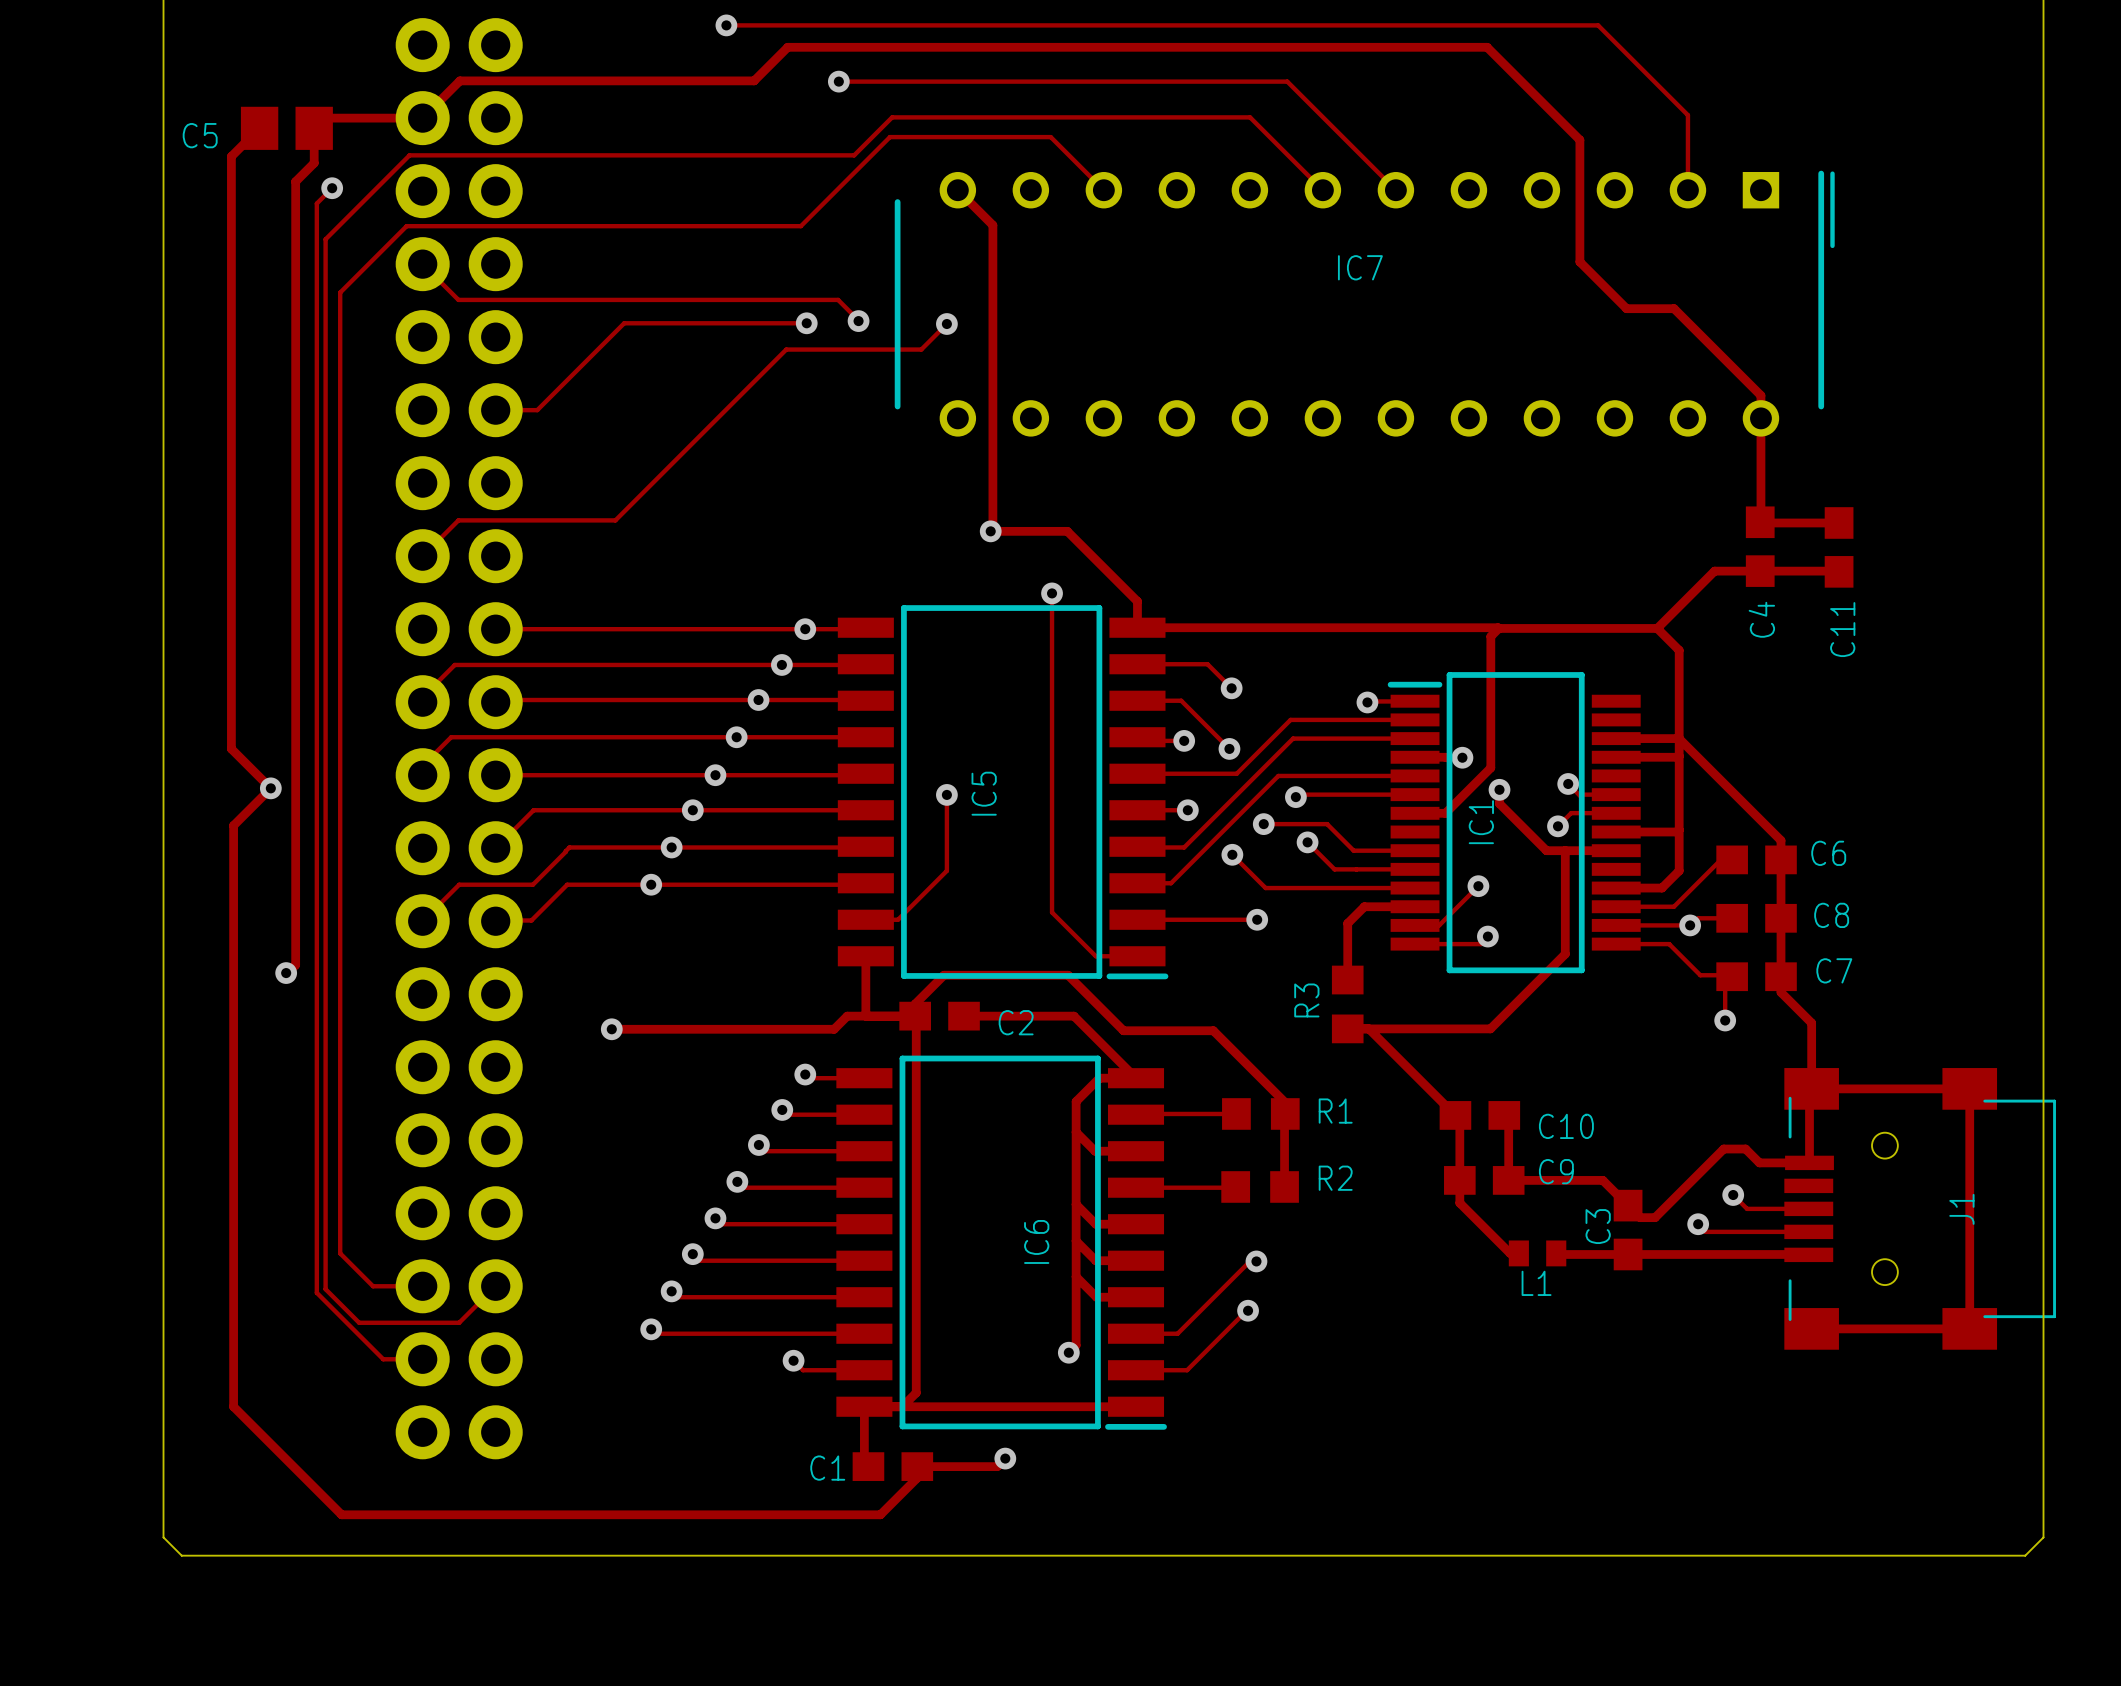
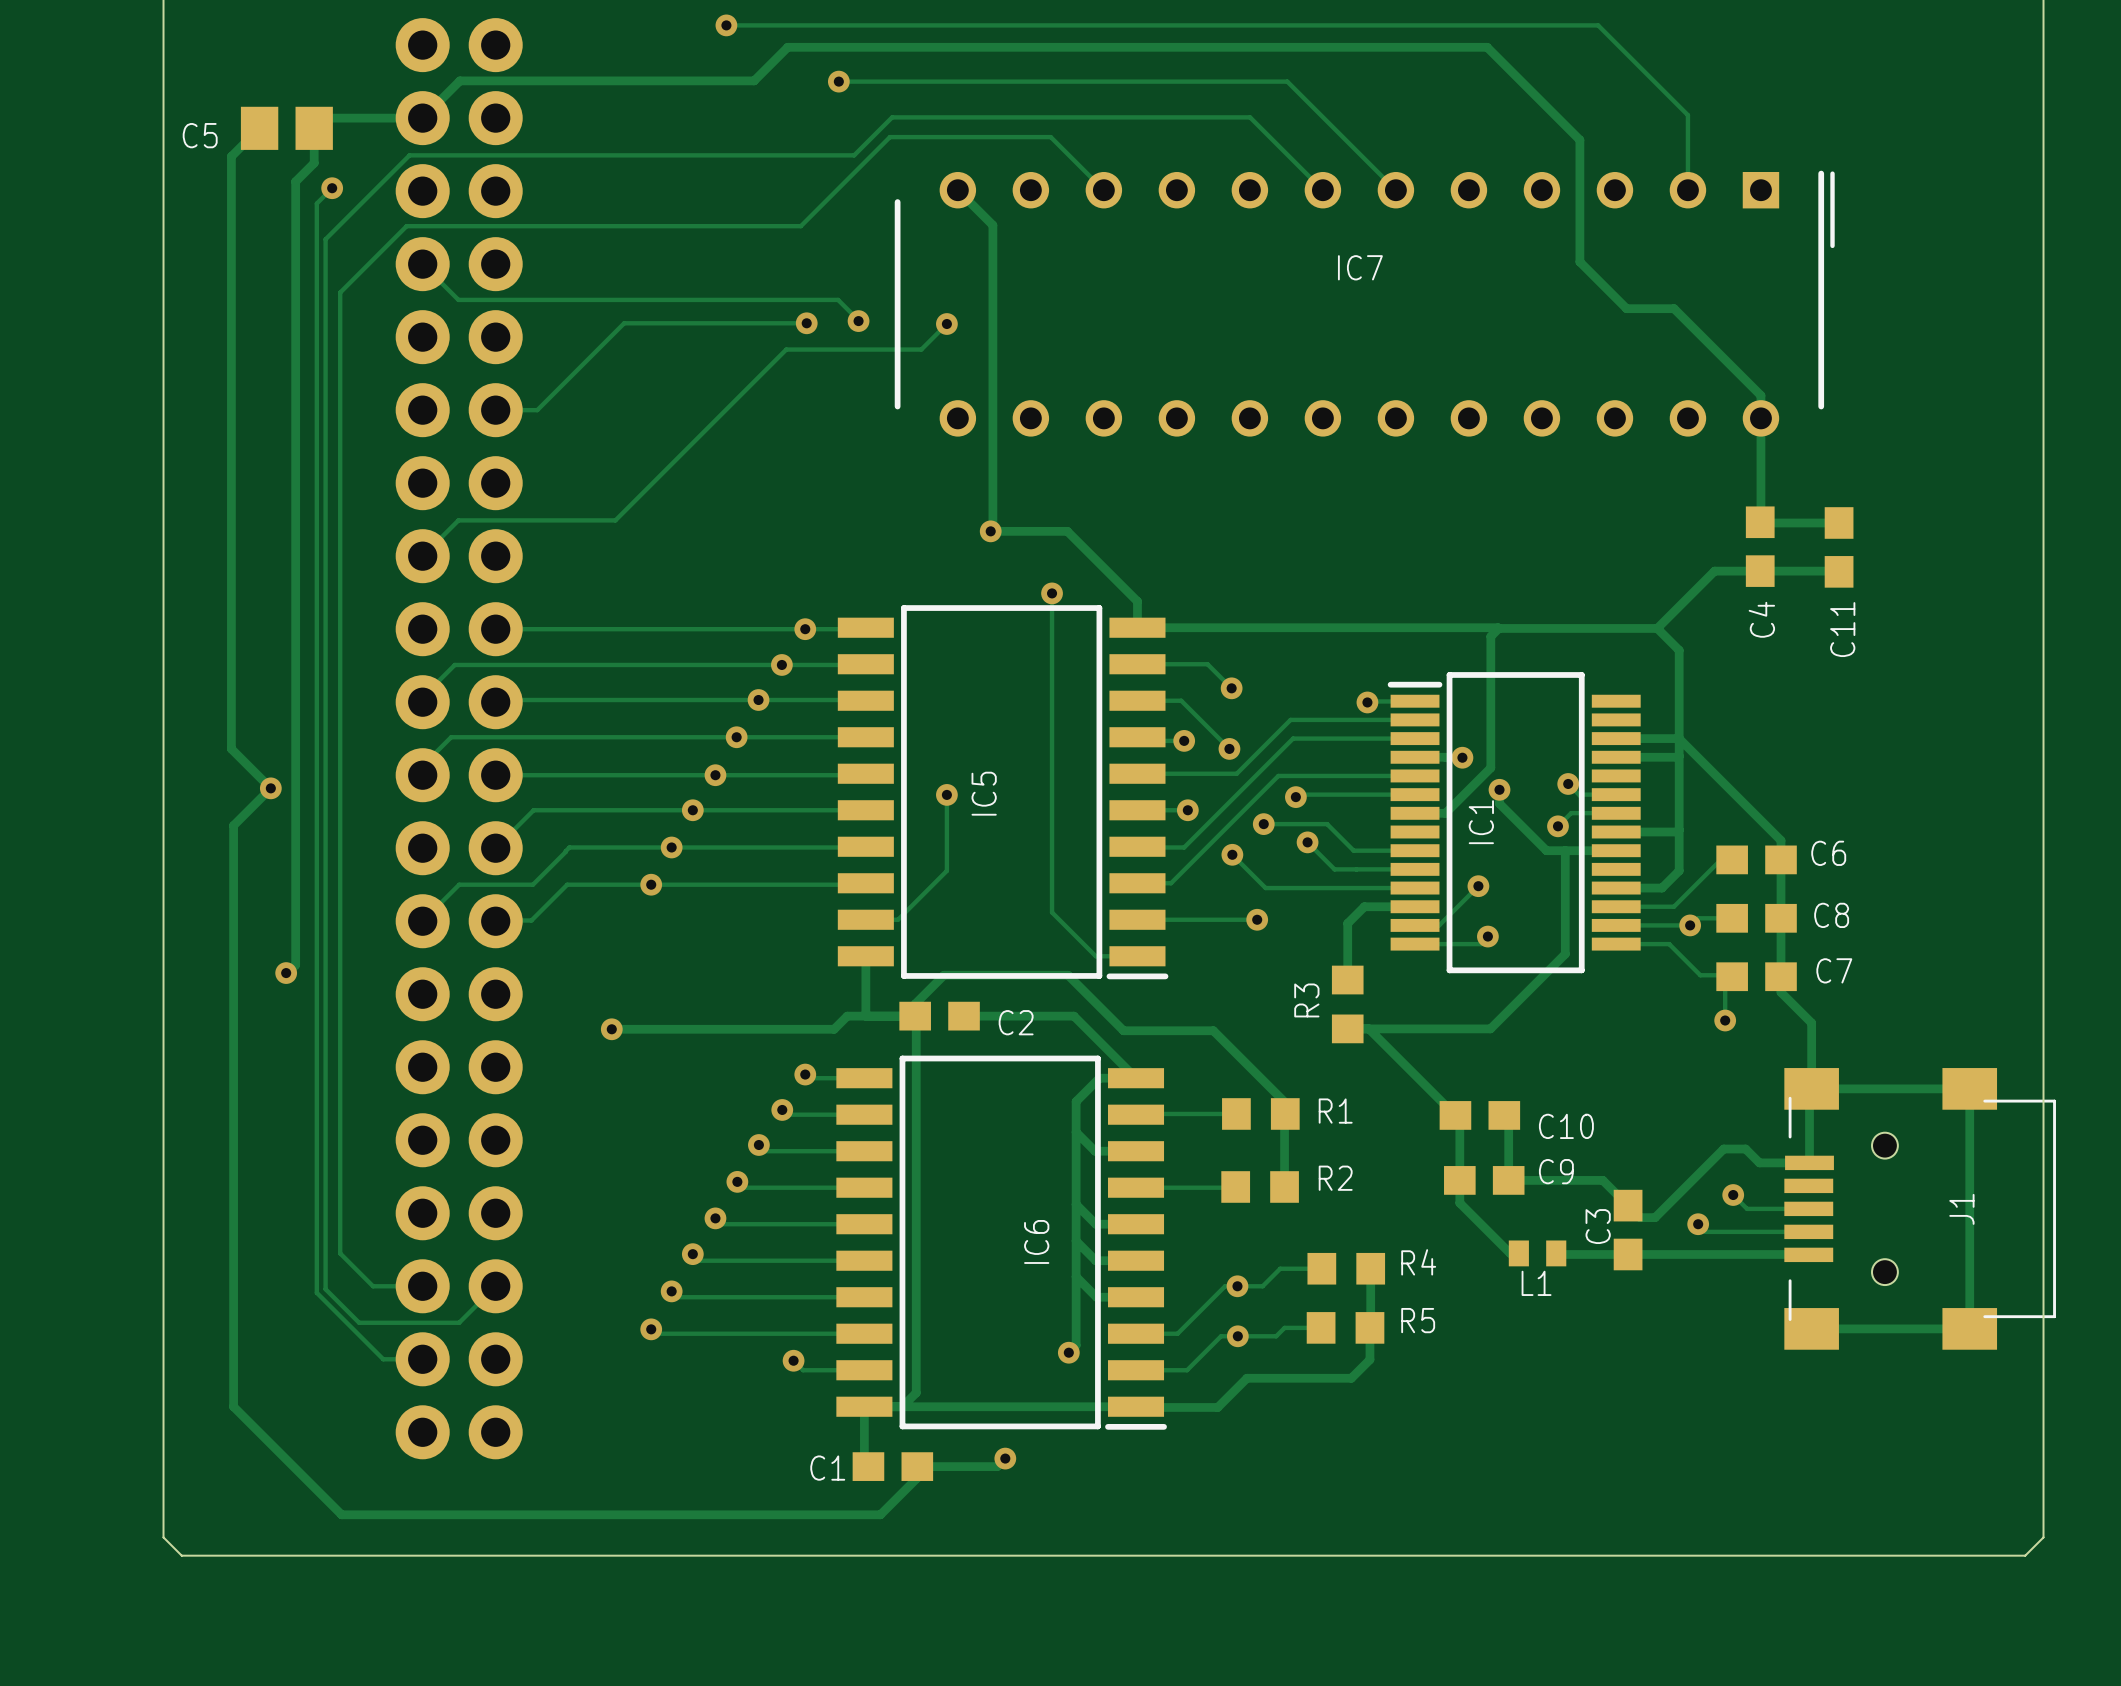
track: (1256, 1261) (1249, 1261) (1225, 1286) -> (1321, 1268) (1280, 1268) (1262, 1286) (1225, 1286)
via: (1256, 1261) -> none
R4: none -> (1346, 1268)
track: none -> (1370, 1268) (1369, 1359) (1351, 1378) (1246, 1378) (1217, 1407) (1136, 1406)
via: none -> (1237, 1286)
track: (1248, 1310) (1221, 1336) -> (1321, 1327) (1284, 1327) (1276, 1336) (1221, 1336)
via: (1248, 1310) -> none
R5: none -> (1345, 1327)
via: none -> (1237, 1336)

